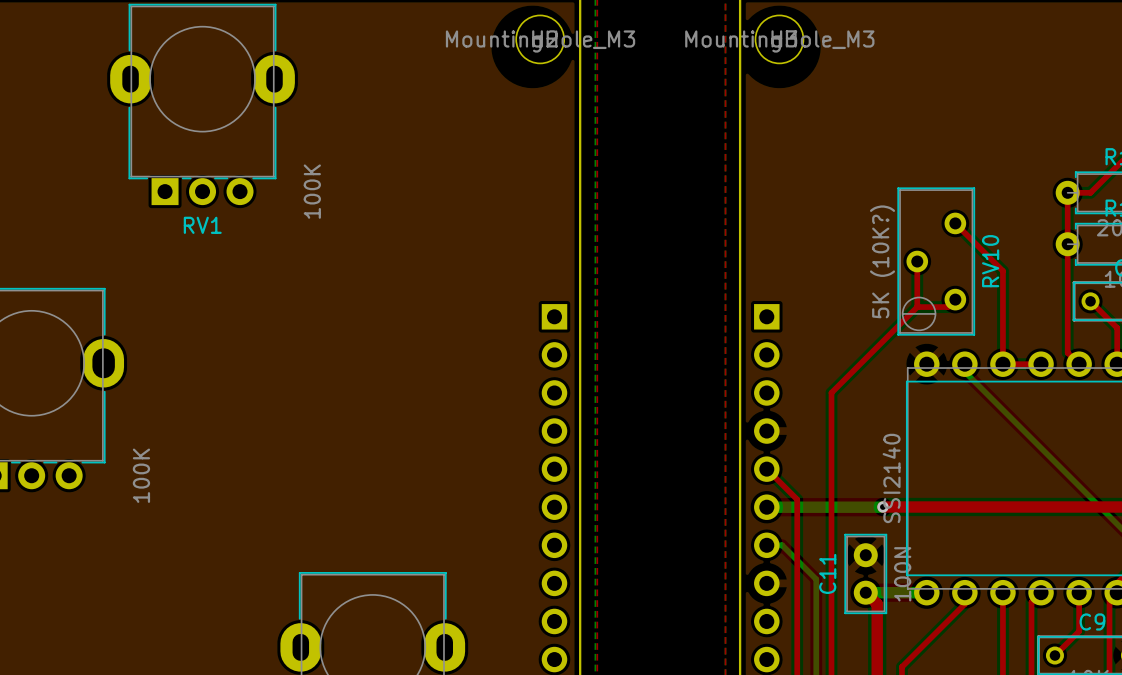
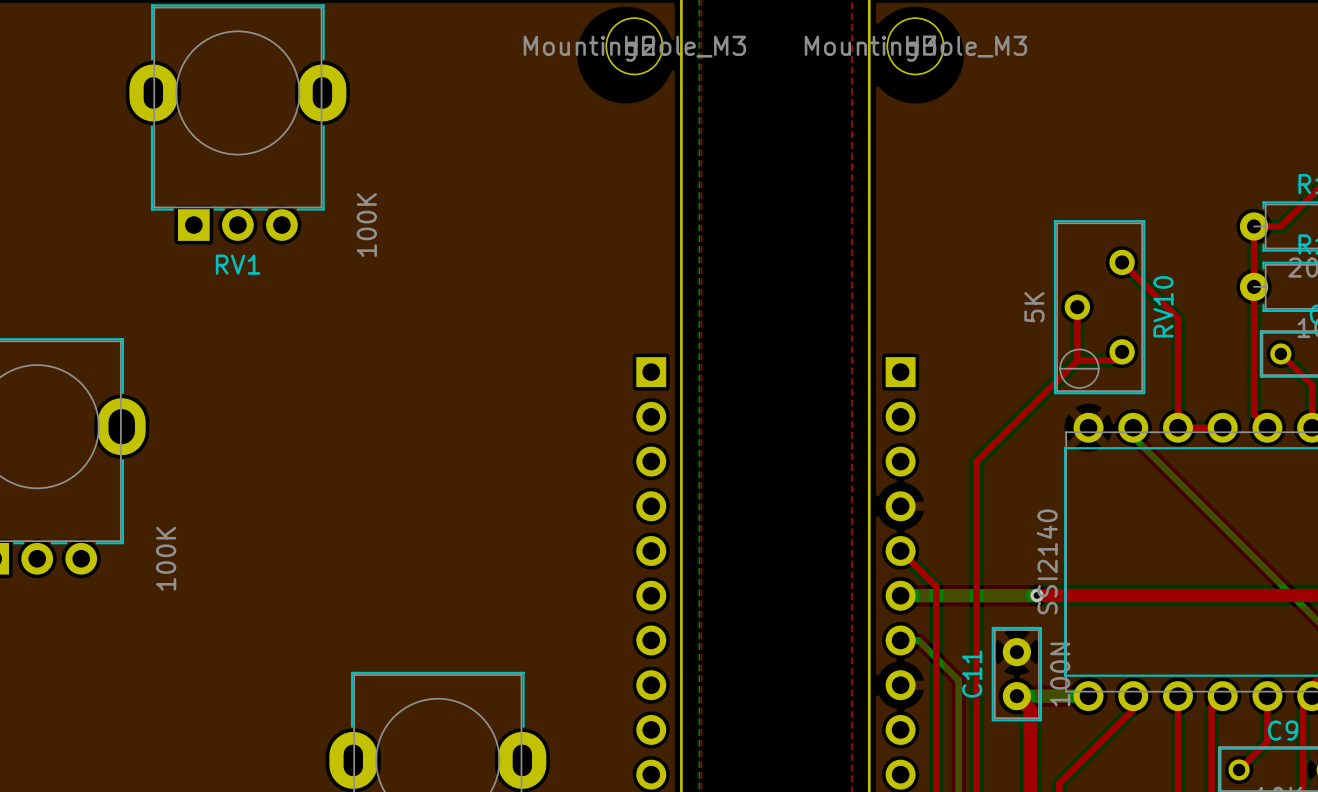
RV10 value: 5K (10K?) (882, 261) -> 5K (1034, 307)

